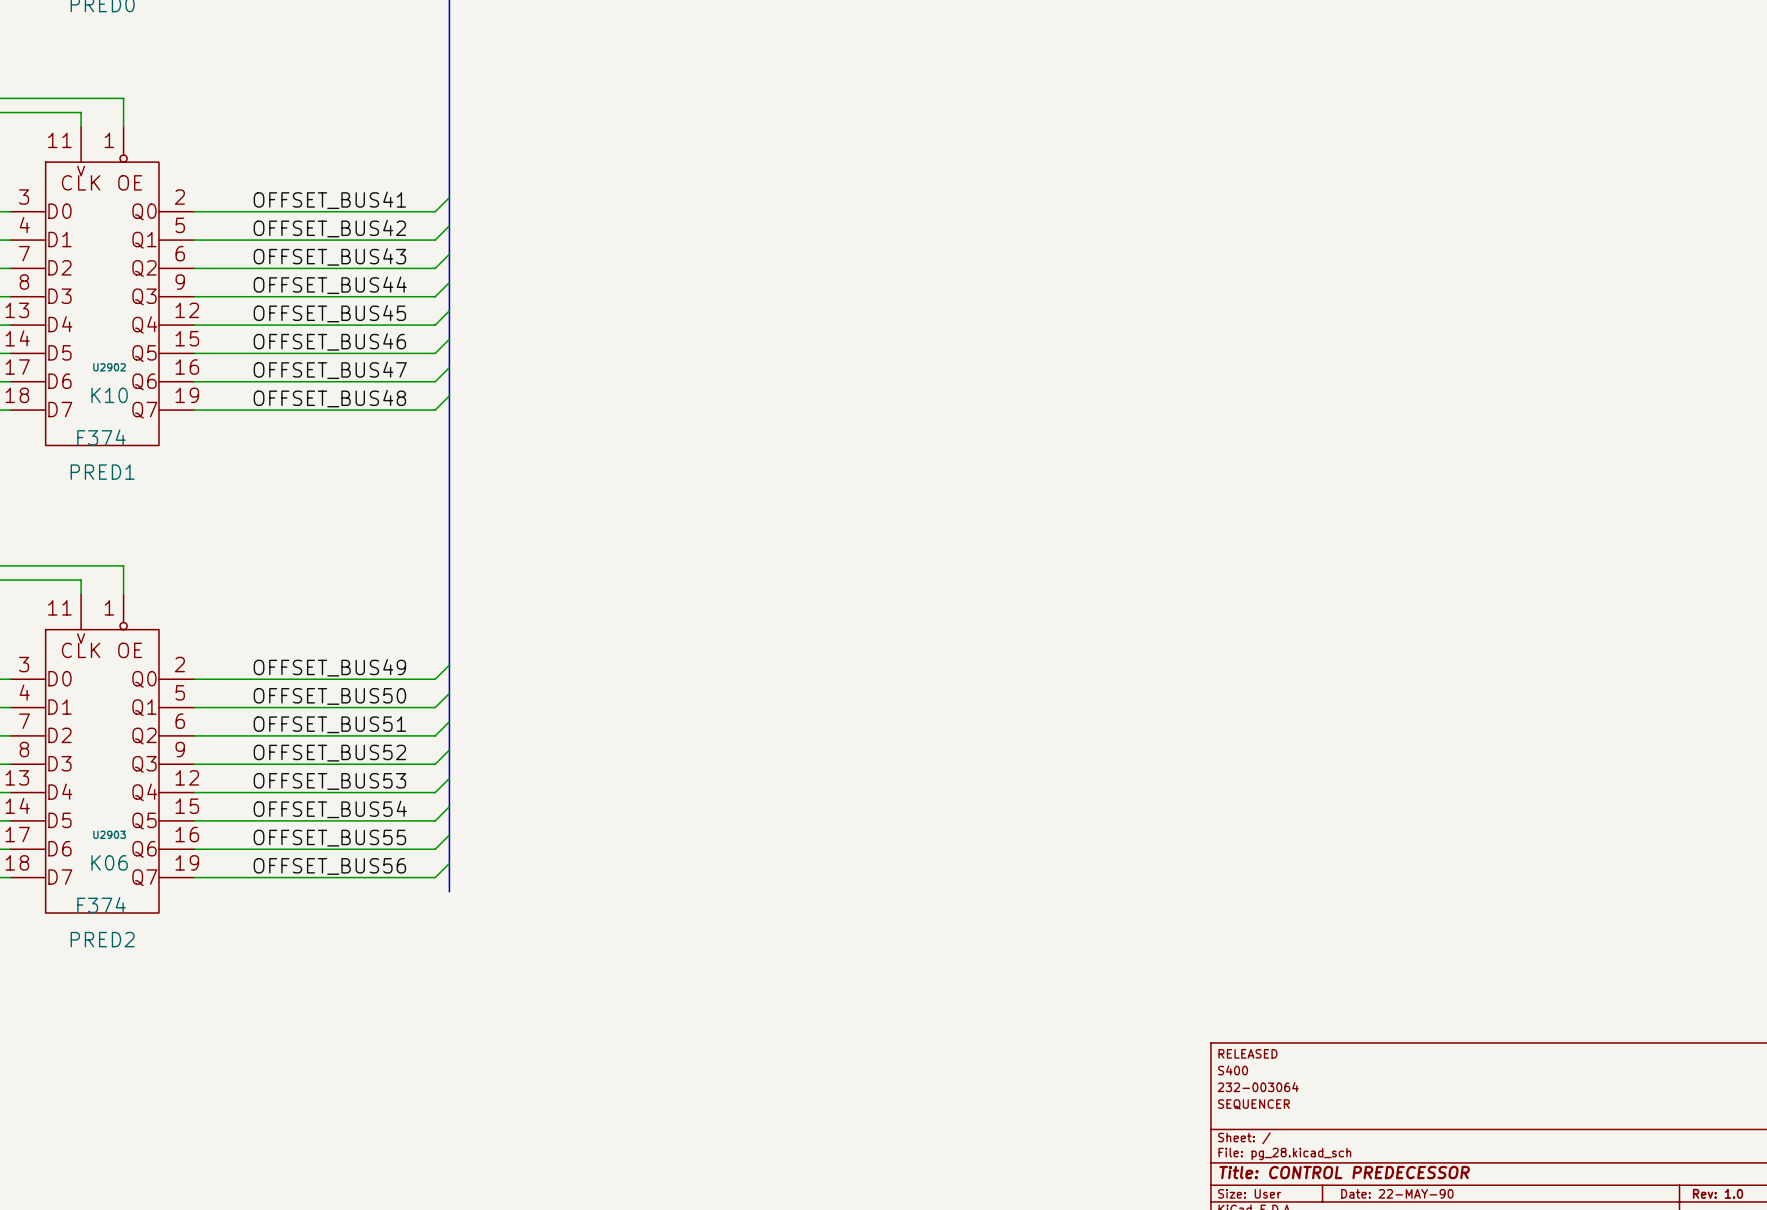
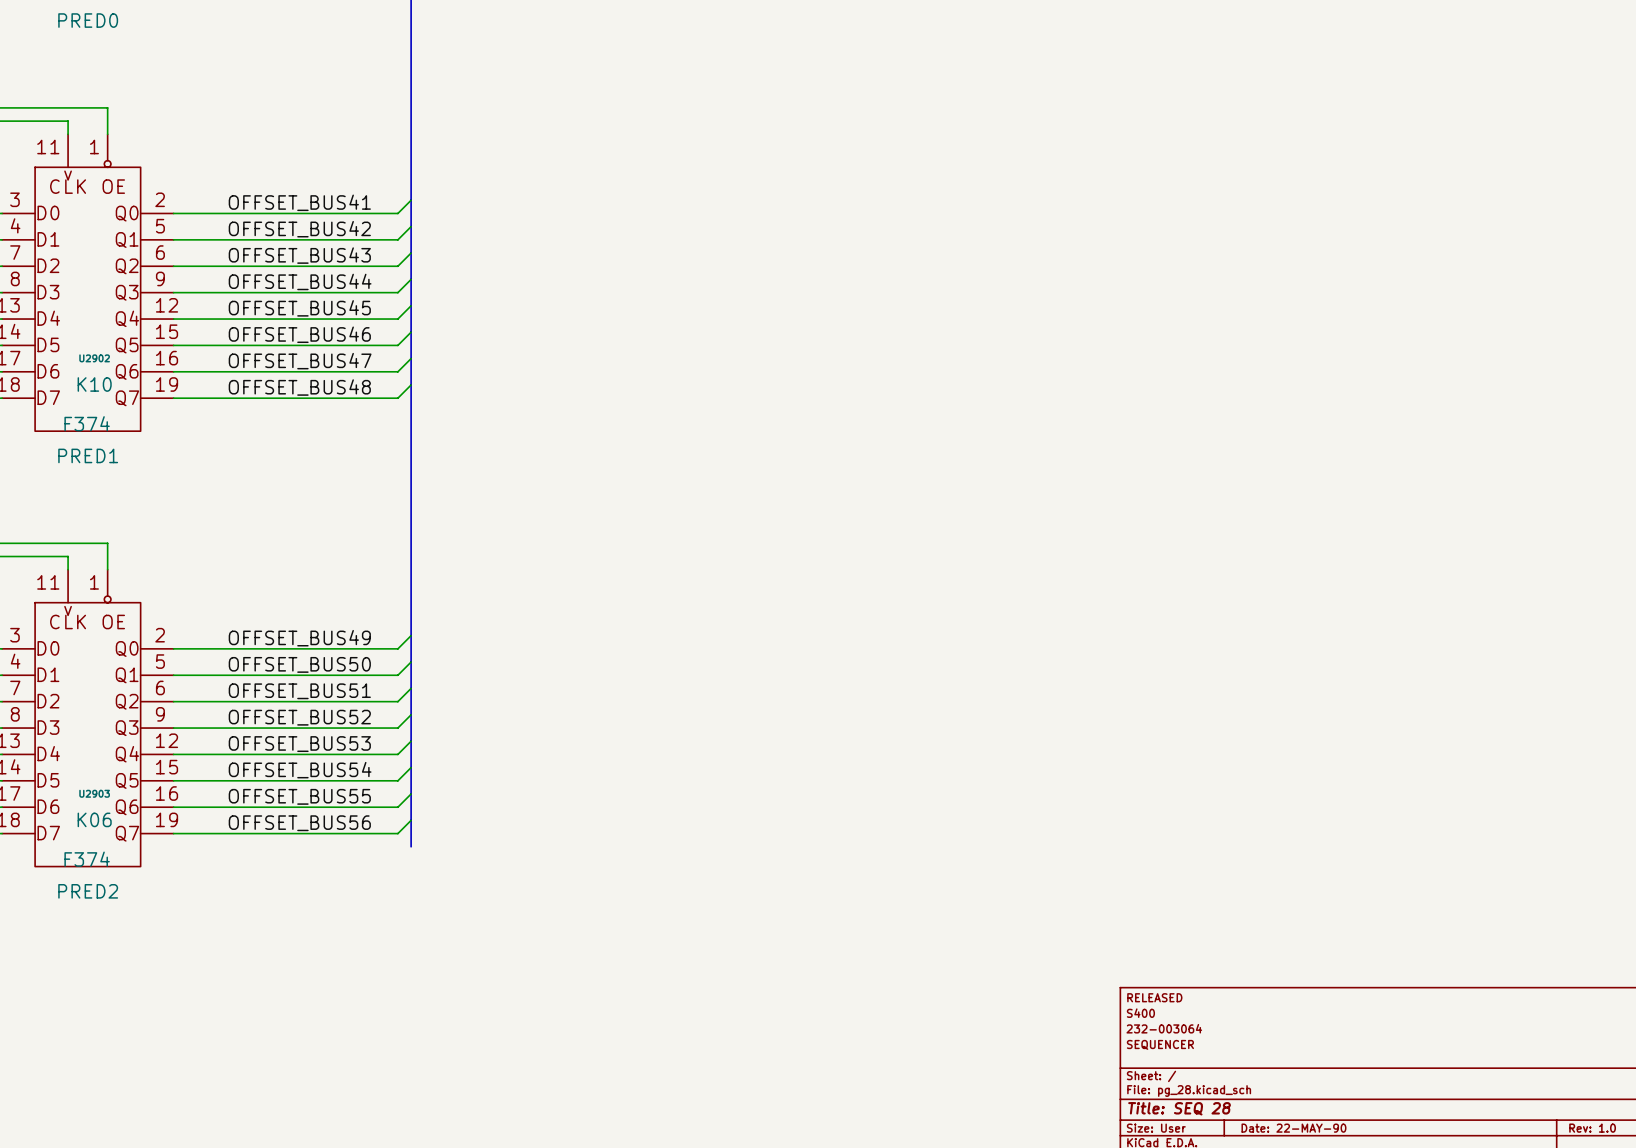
title block: Title: CONTROL PREDECESSOR (1344, 1172) -> Title: SEQ 28 (1179, 1108)

